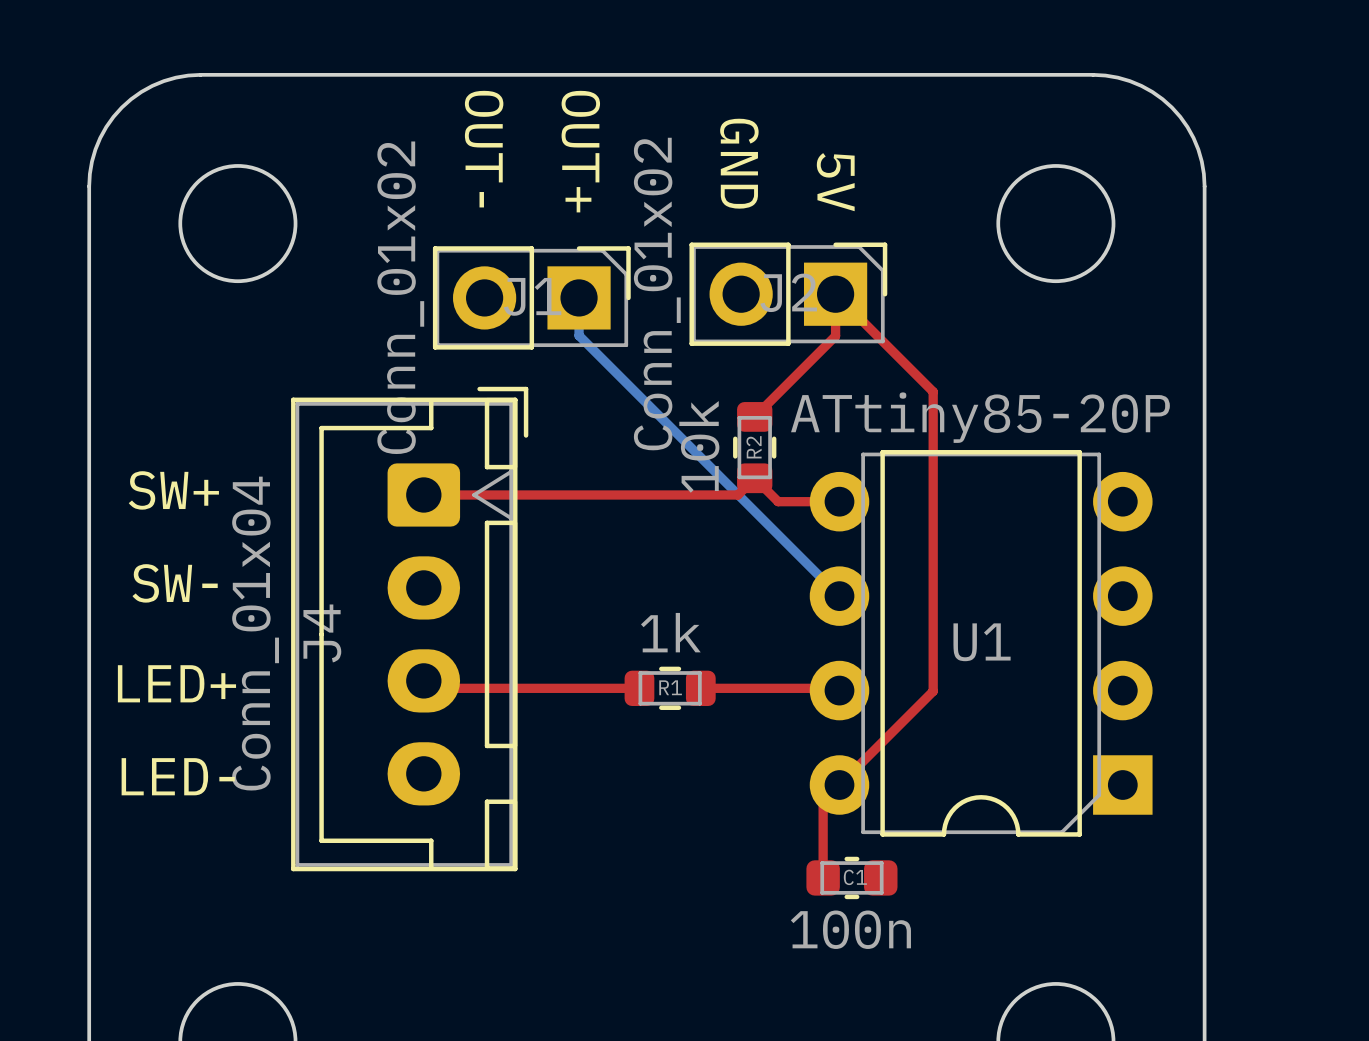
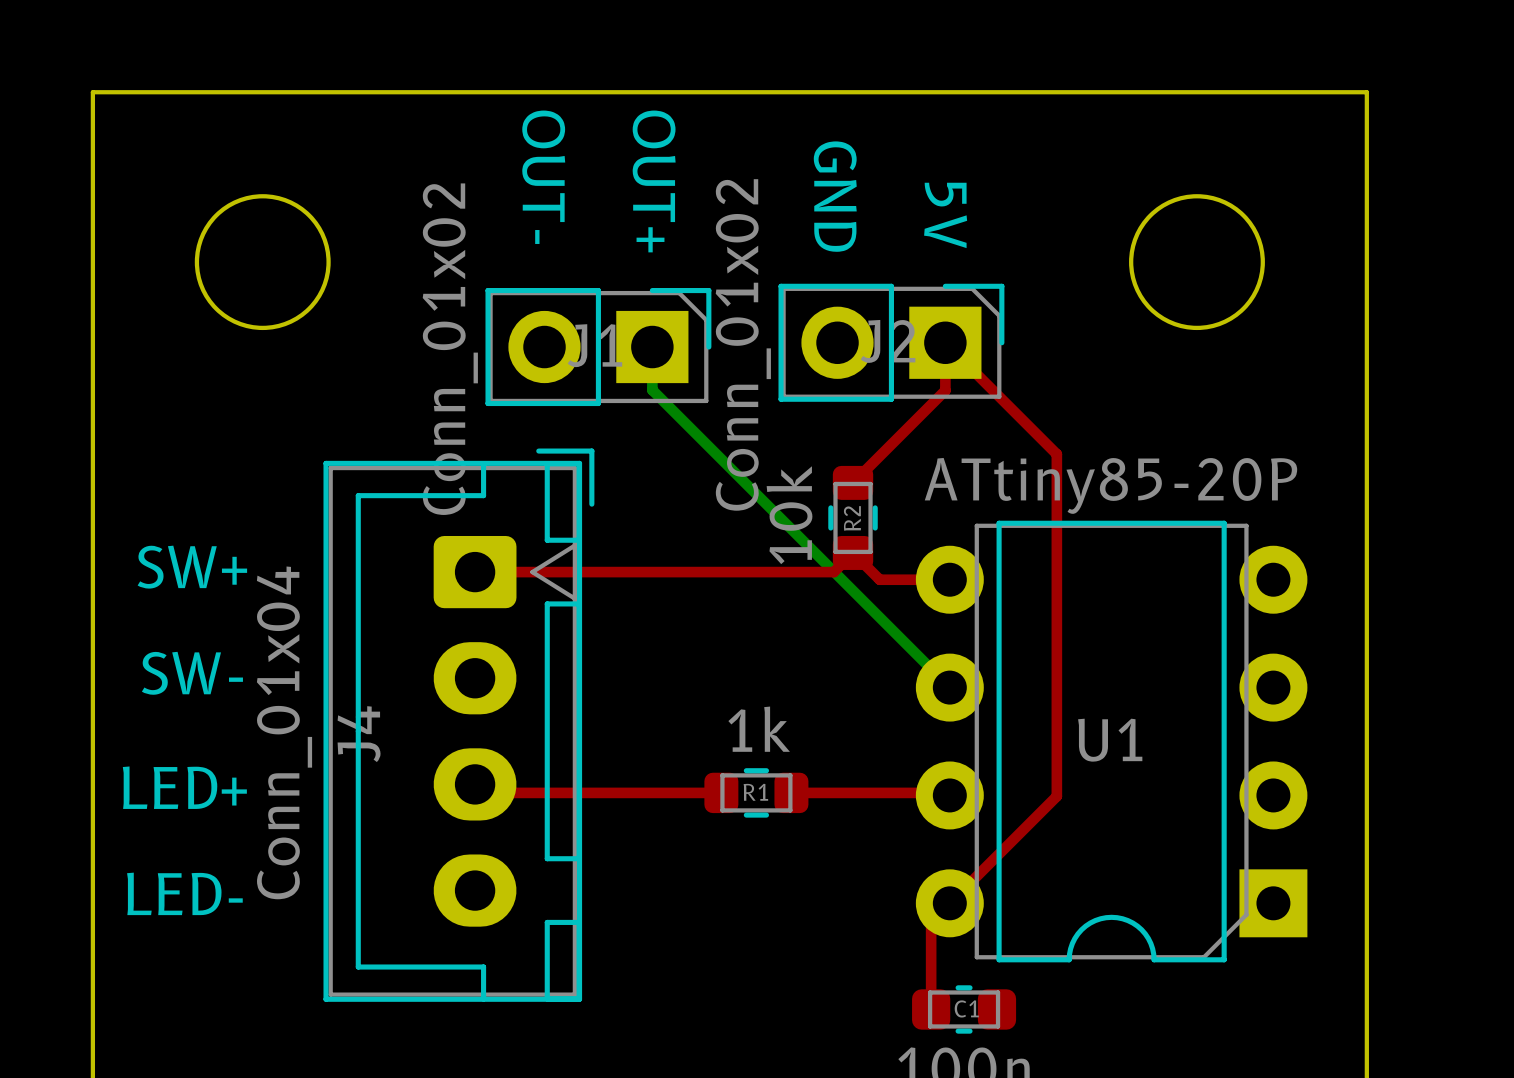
board edge: (200, 74) (163, 81) (141, 91) (121, 107) (100, 137) (91, 161) (89, 186) -> (220, 92) (92, 92) (92, 219)
board edge: (1093, 74) (1117, 77) (1141, 85) (1171, 107) (1193, 137) (1201, 161) (1204, 186) -> (1239, 92) (1366, 92) (1366, 219)

